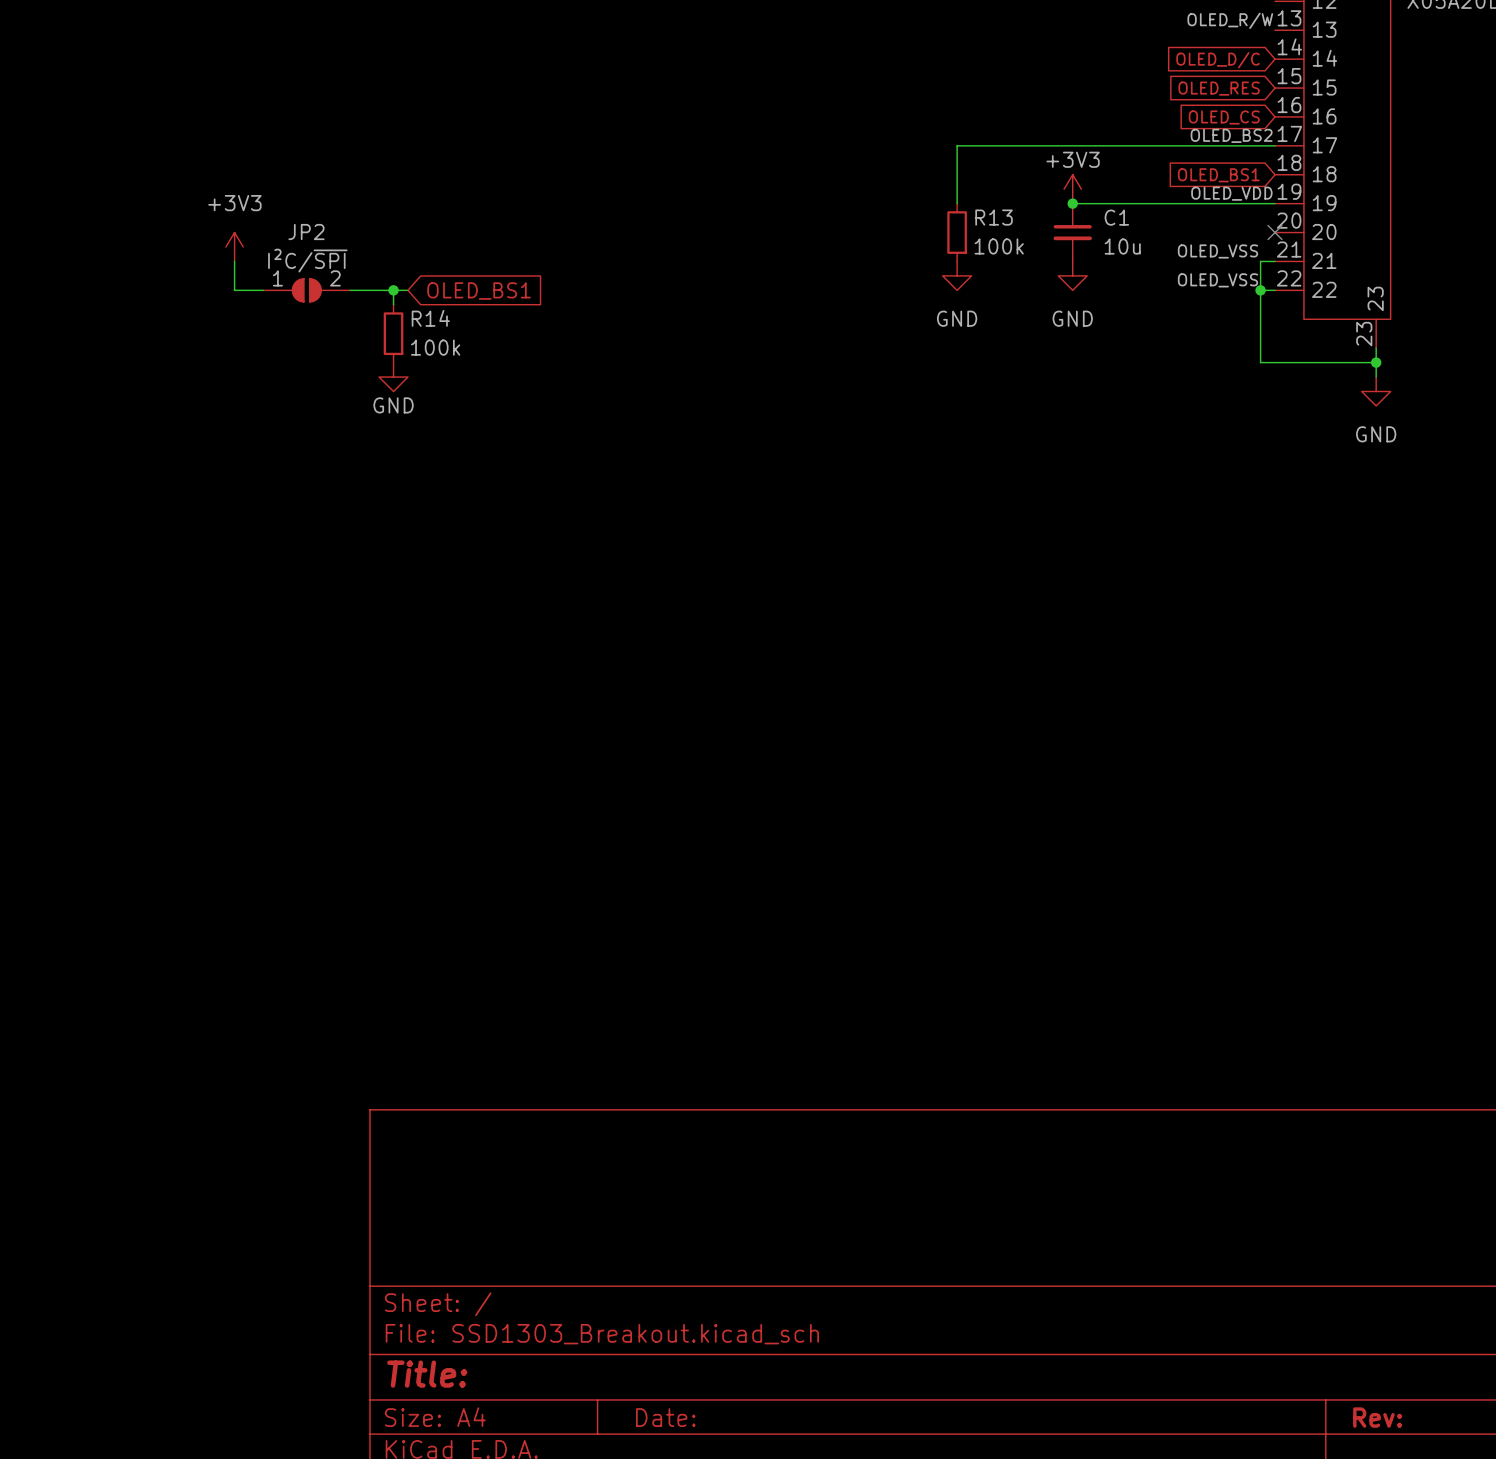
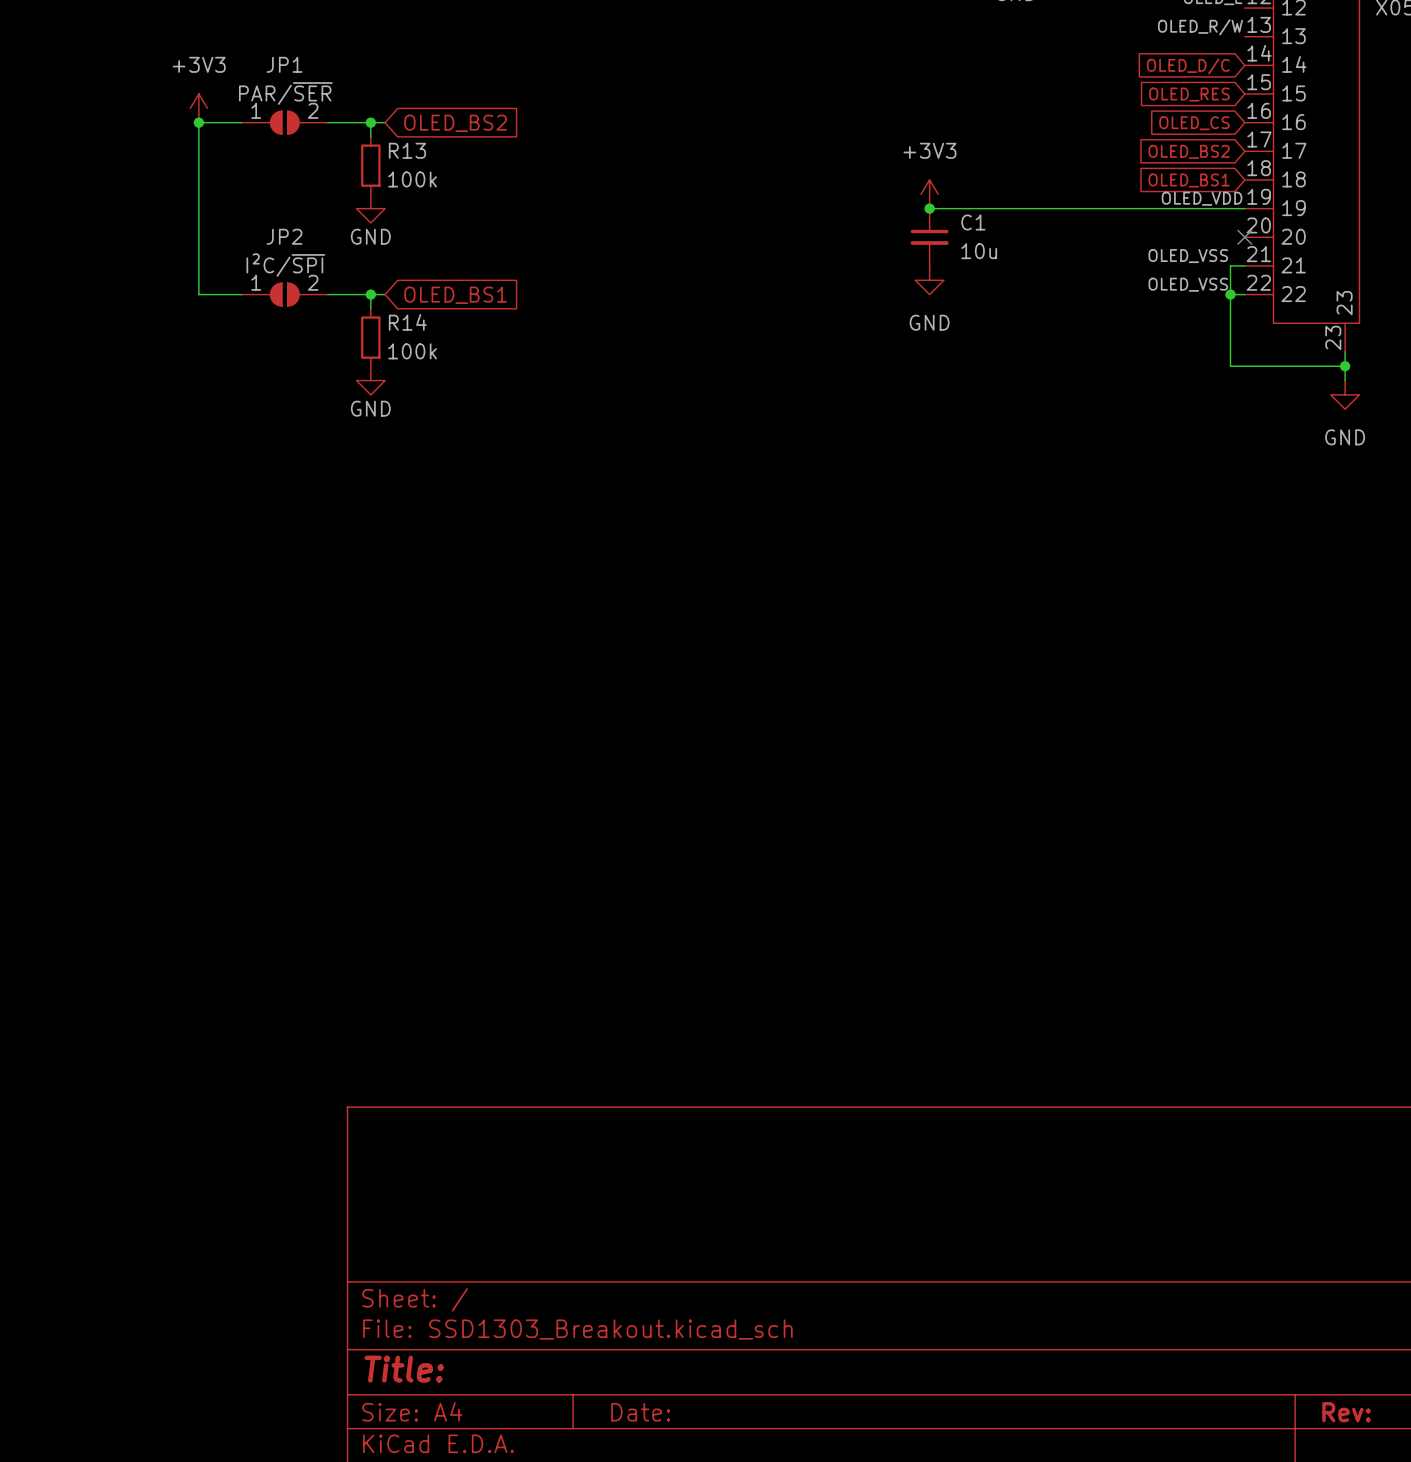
junction: none -> (198, 122)
JP1: none -> PAR/~{SER} (284, 122)
wire: none -> (327, 122) (385, 122)
wire: none -> (370, 122) (370, 136)
junction: none -> (370, 122)
global label: none -> OLED_BS2 (455, 123)
label: OLED_BS2 (1231, 135) -> none
wire: (1275, 145) (957, 145) (957, 203) -> (1044, 208) (929, 208)
global label: none -> OLED_BS2 (1189, 151)
power symbol text position: +3V3 (1073, 159) -> +3V3 (929, 150)
power symbol position: +3V3 (1072, 189) -> +3V3 (929, 194)
power symbol: none -> GND (370, 208)
junction: none -> (929, 208)
junction: (1072, 203) -> none
R13 position: (957, 232) -> (370, 165)
C1 position: (1072, 232) -> (929, 237)
power symbol position: +3V3 (234, 247) -> +3V3 (198, 108)
wire: (234, 261) (234, 290) -> (241, 122) (198, 122) (198, 294) (213, 294)
power symbol: GND (1072, 275) -> none

